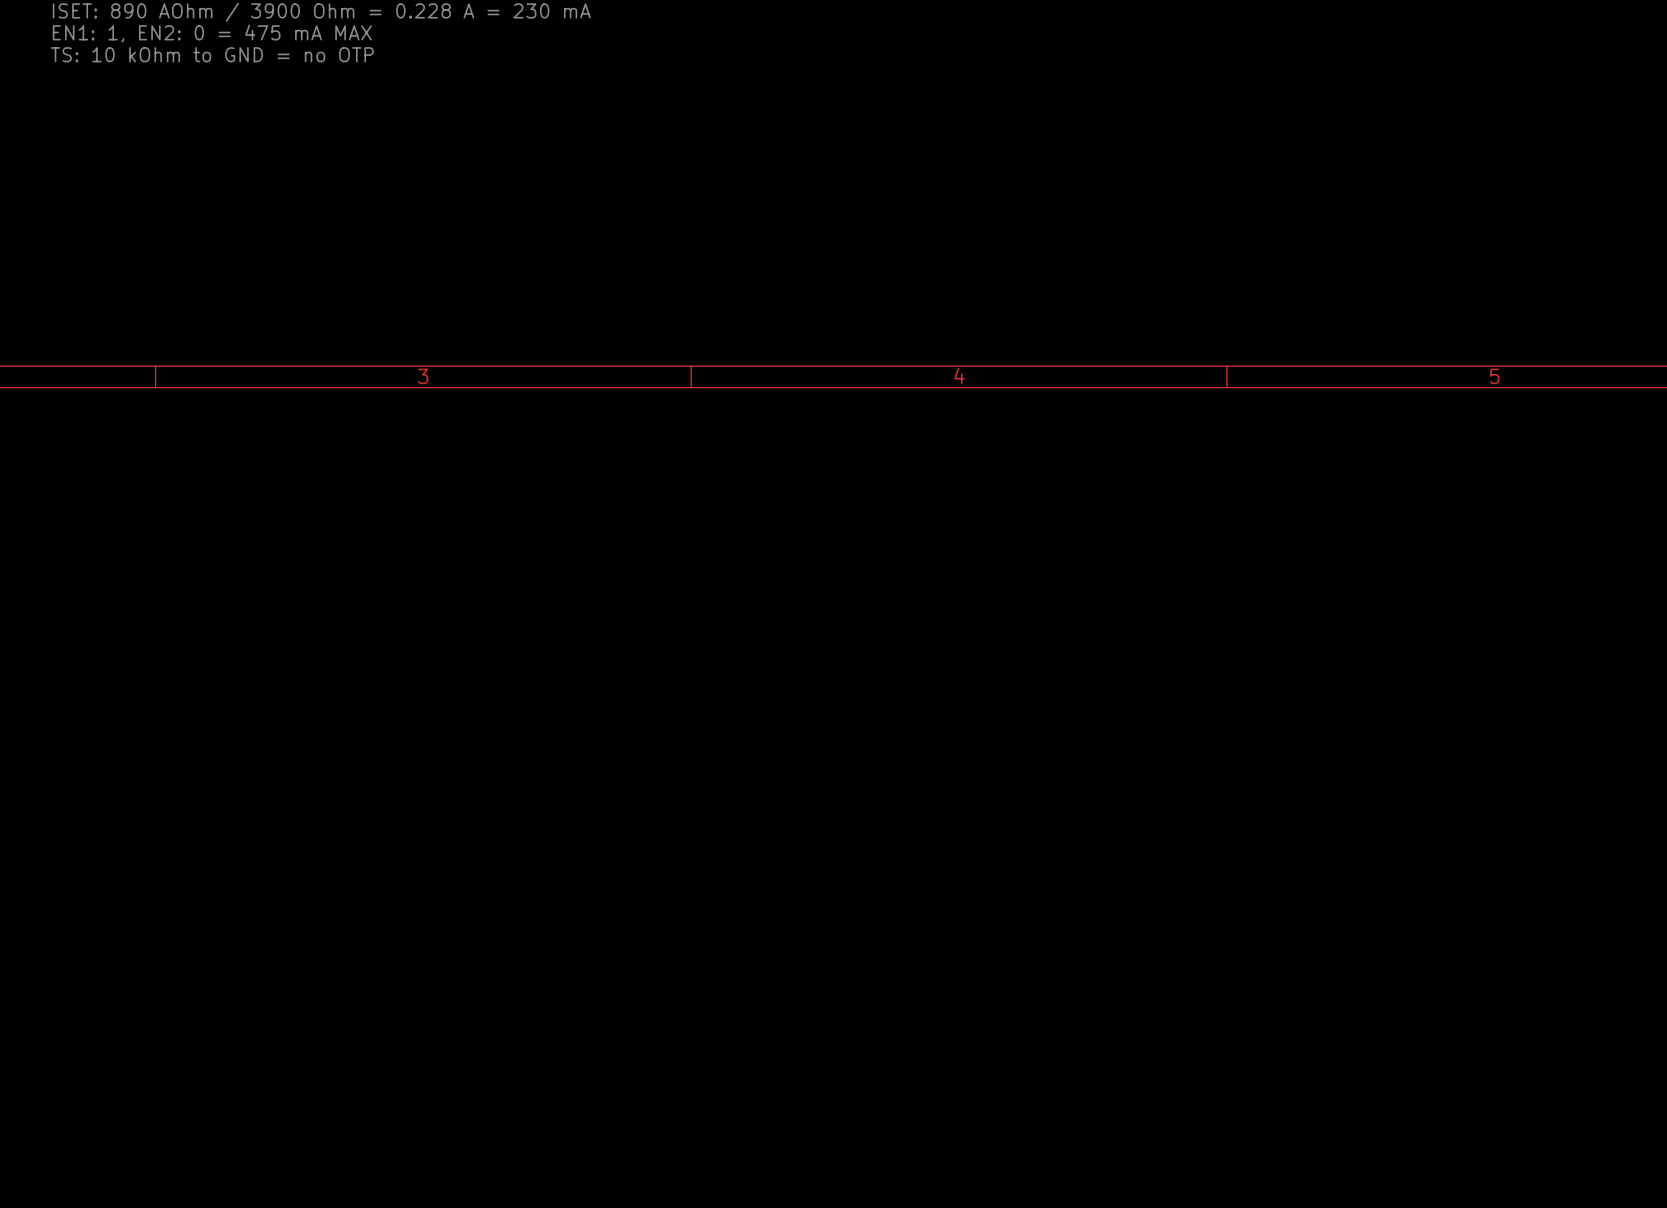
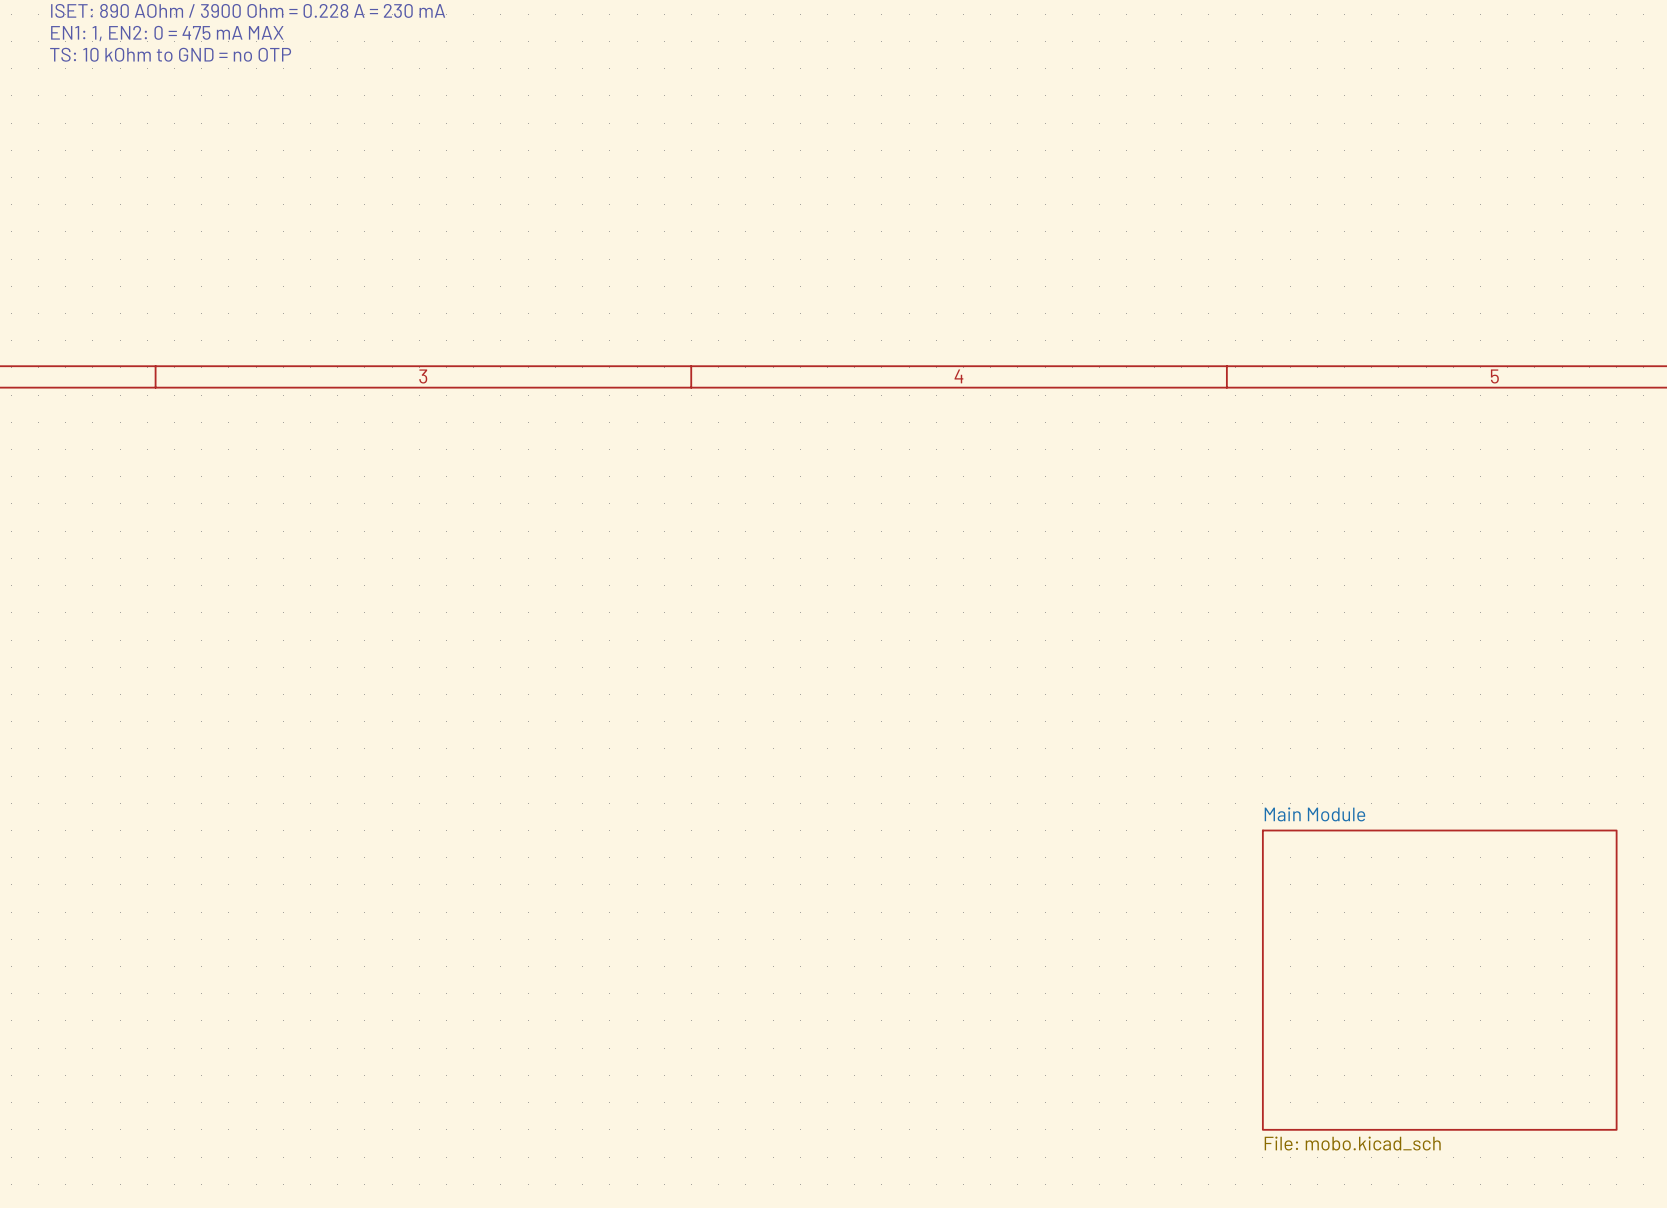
sheet Main Module: none -> File: mobo.kicad_sch (1439, 980)

